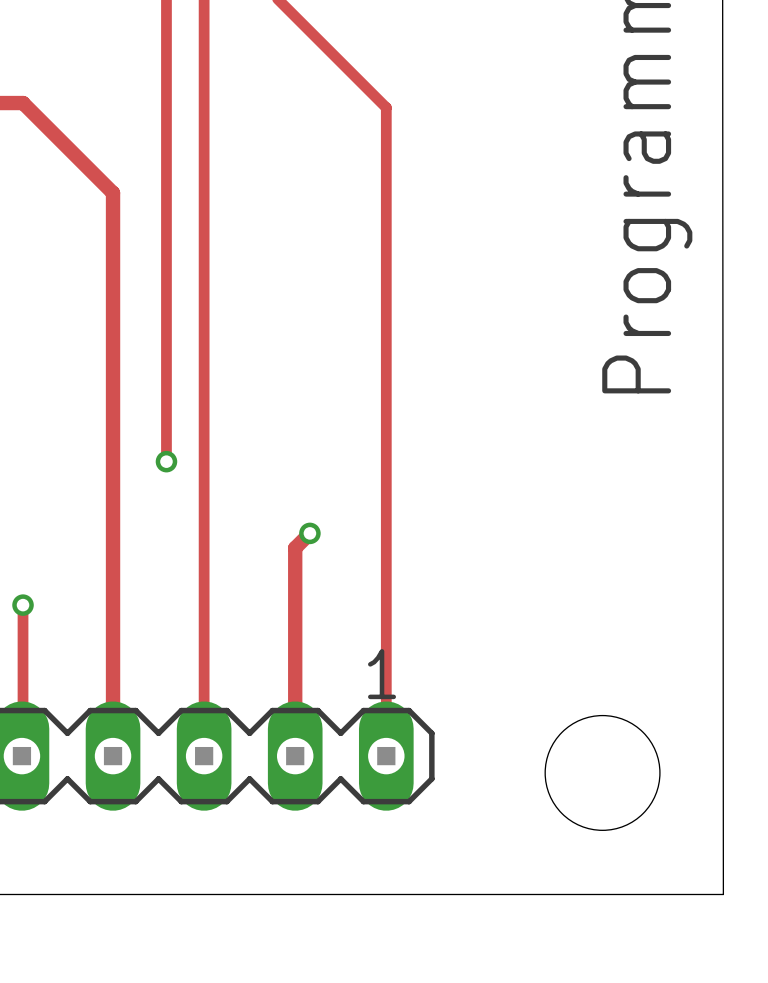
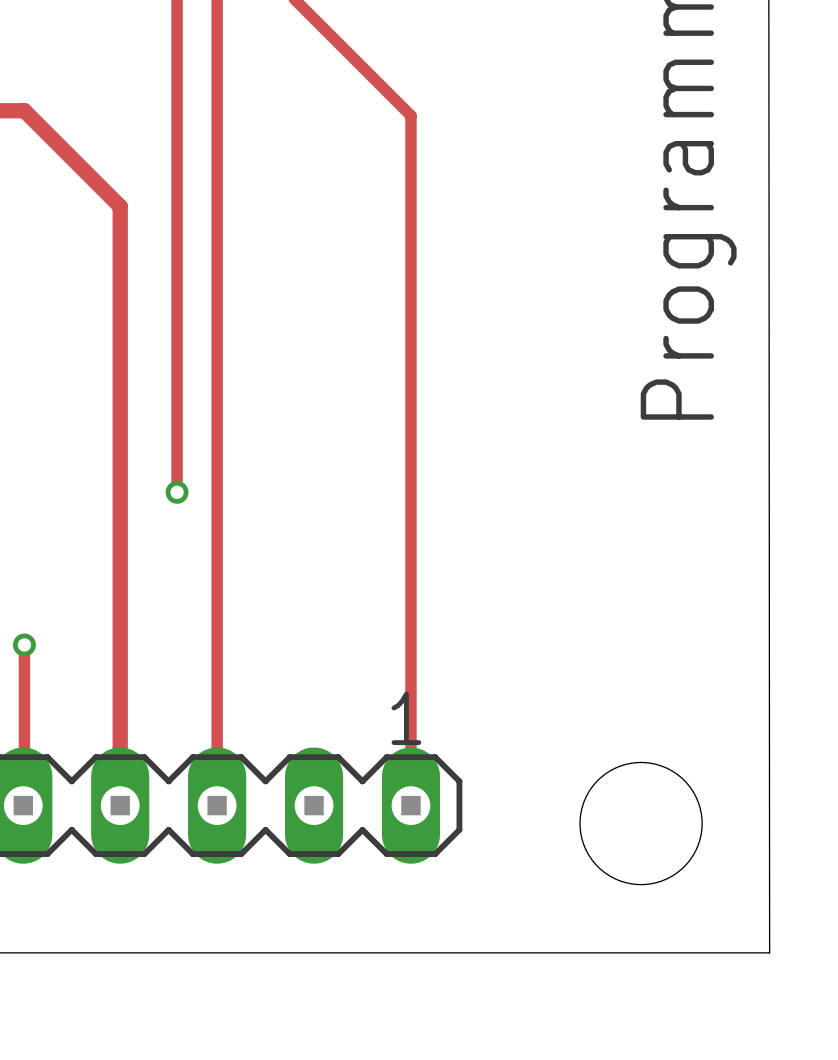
track: (309, 533) (295, 548) (295, 756) -> none
via: (309, 533) -> none

